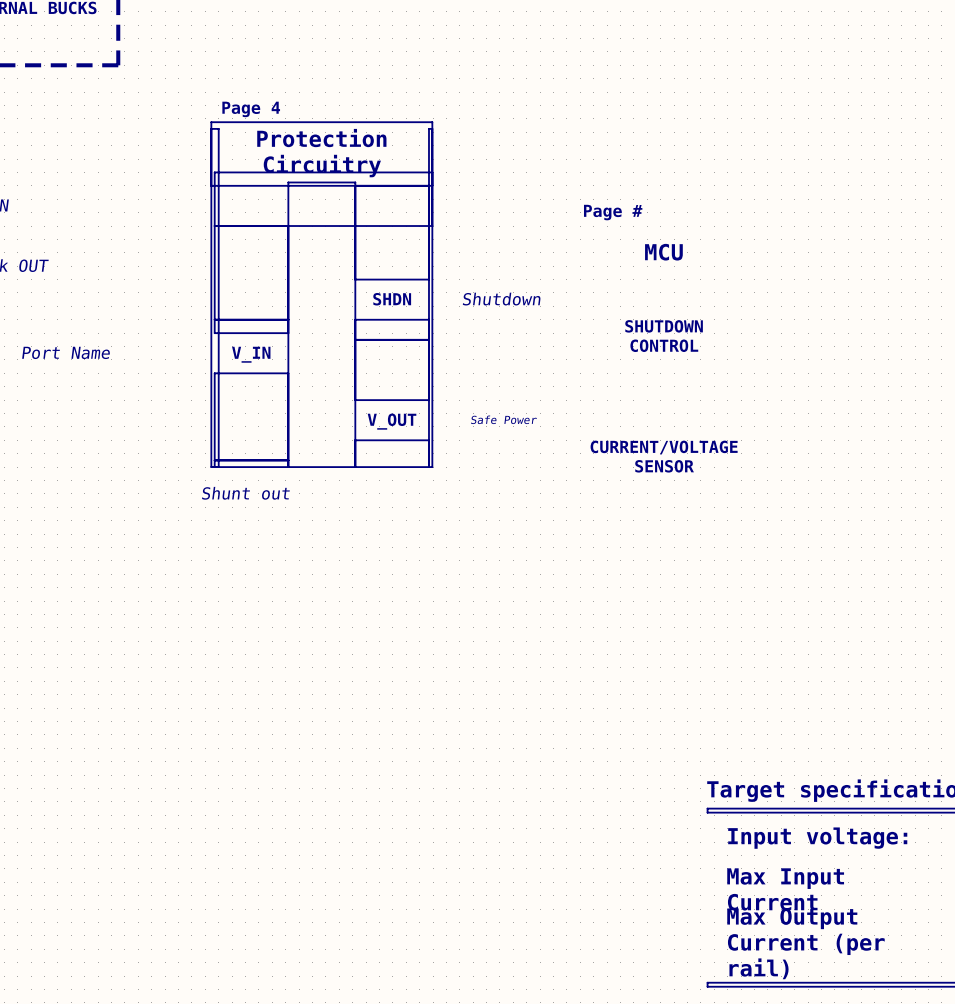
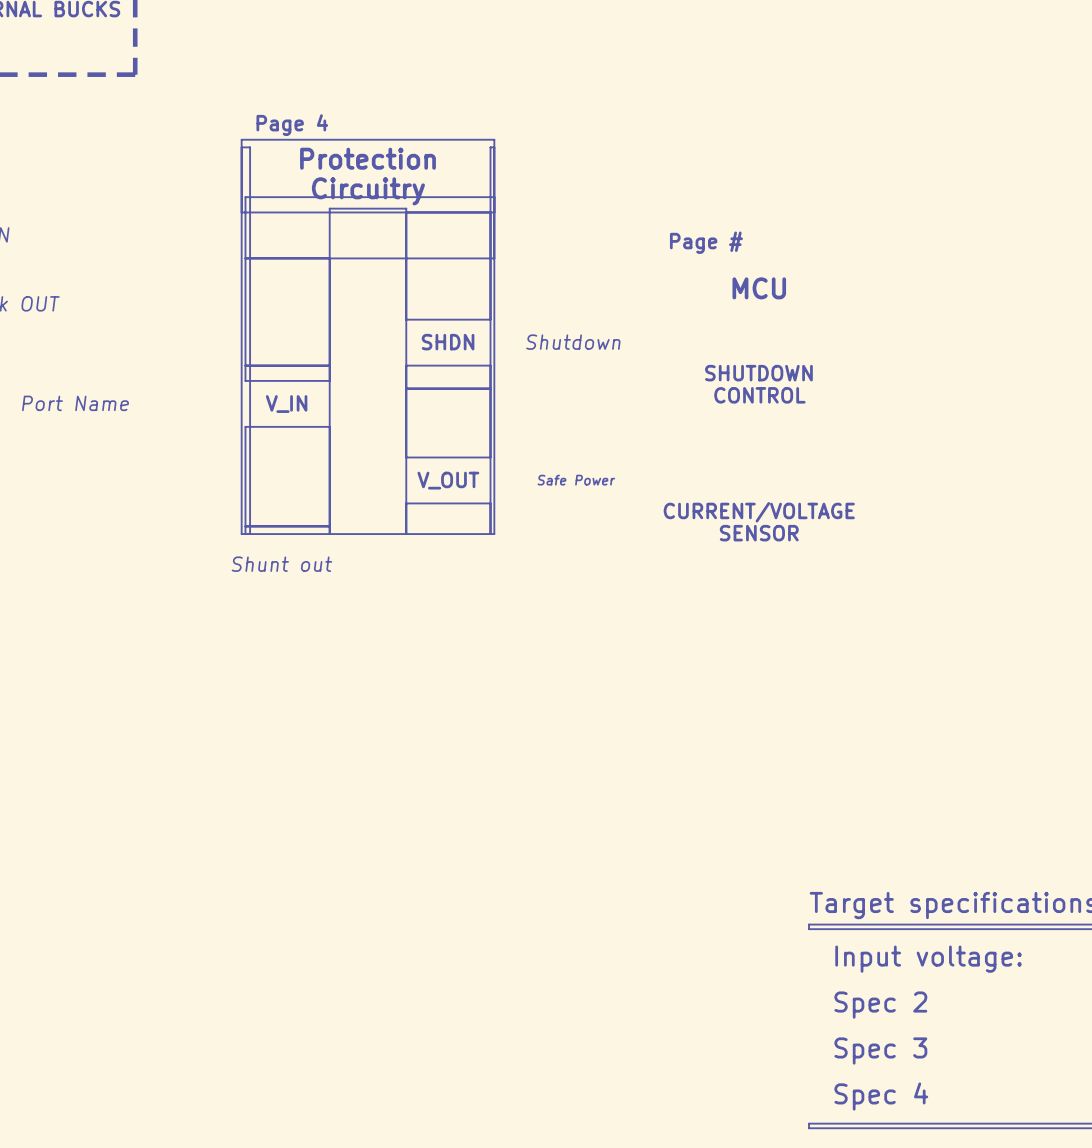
text: Max Input (785, 878) -> Spec 2 (880, 1005)
text: Current (772, 902) -> none
text: Max Output (792, 918) -> Spec 3 (880, 1051)
text: Current (per (806, 944) -> none
text: none -> Spec 4 (881, 1096)
text: rail) (759, 968) -> none

